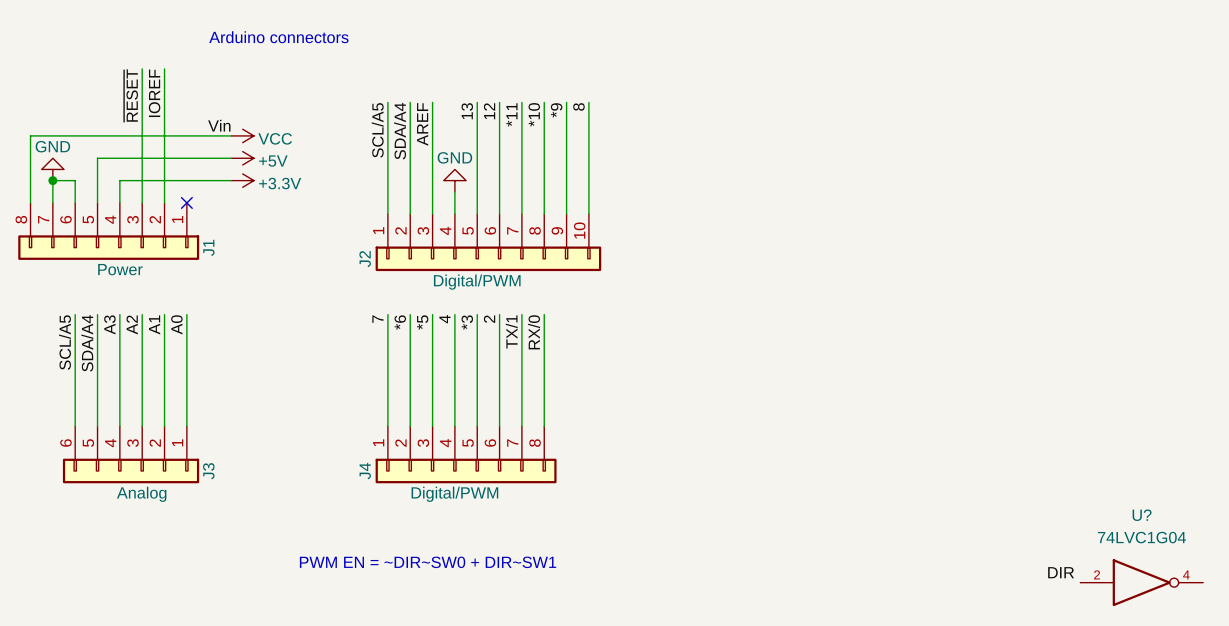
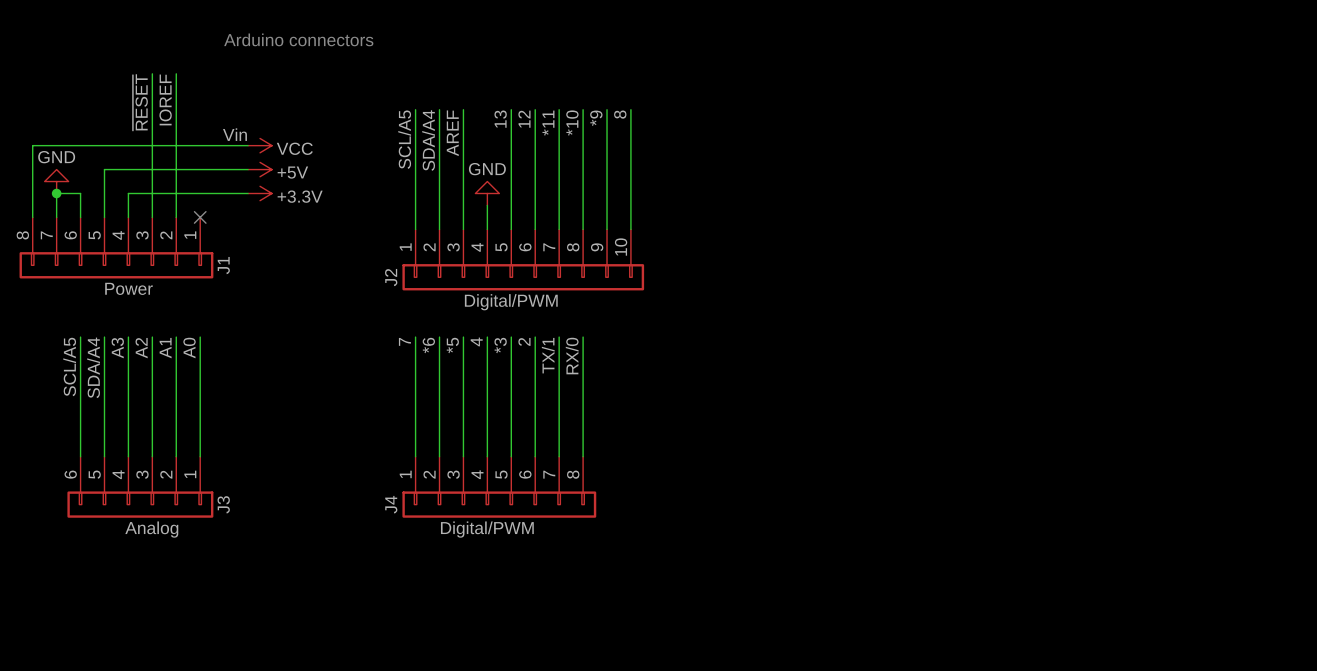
text: PWM EN = ~DIR~SW0 + DIR~SW1 (428, 562) -> none
label: DIR (1061, 572) -> none
U?: 74LVC1G04 (1141, 582) -> none

